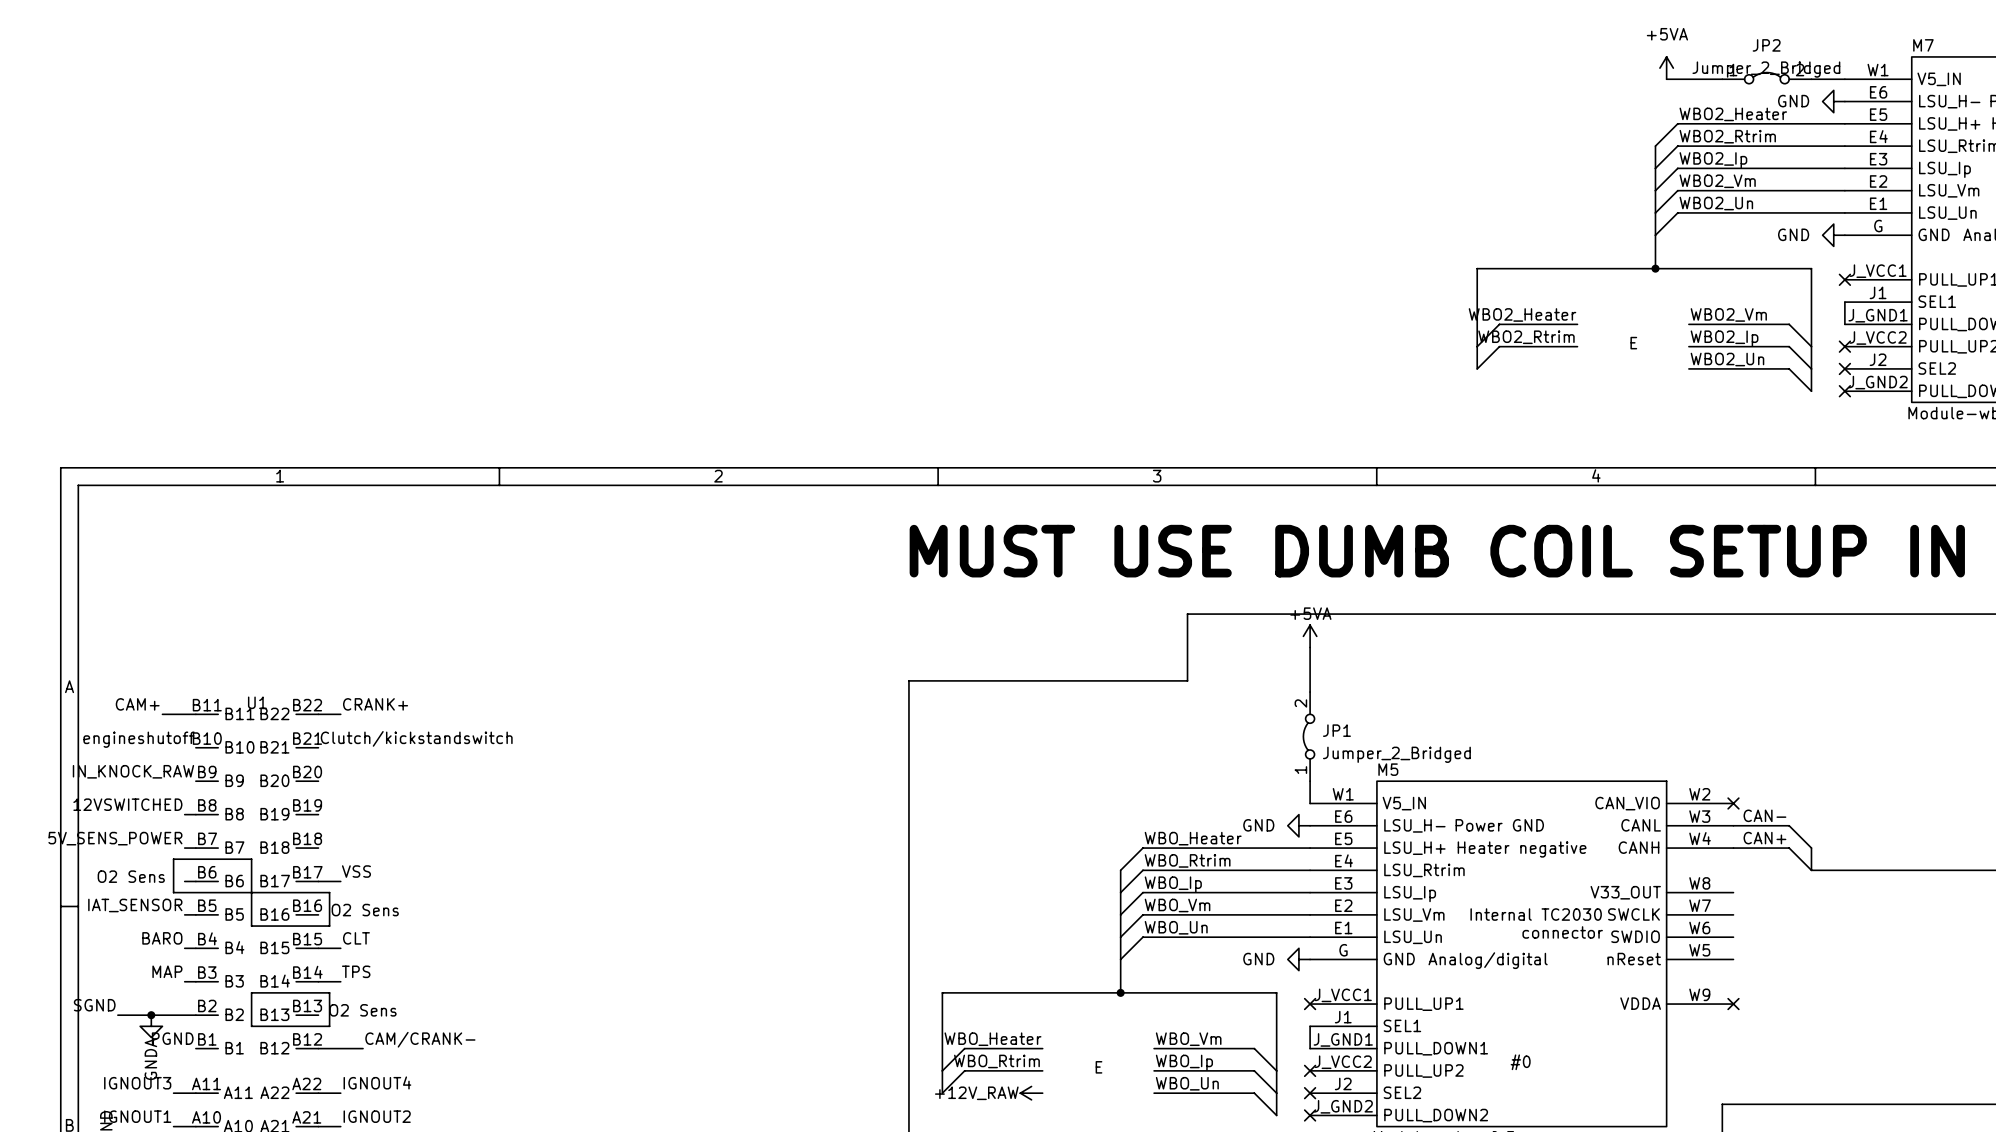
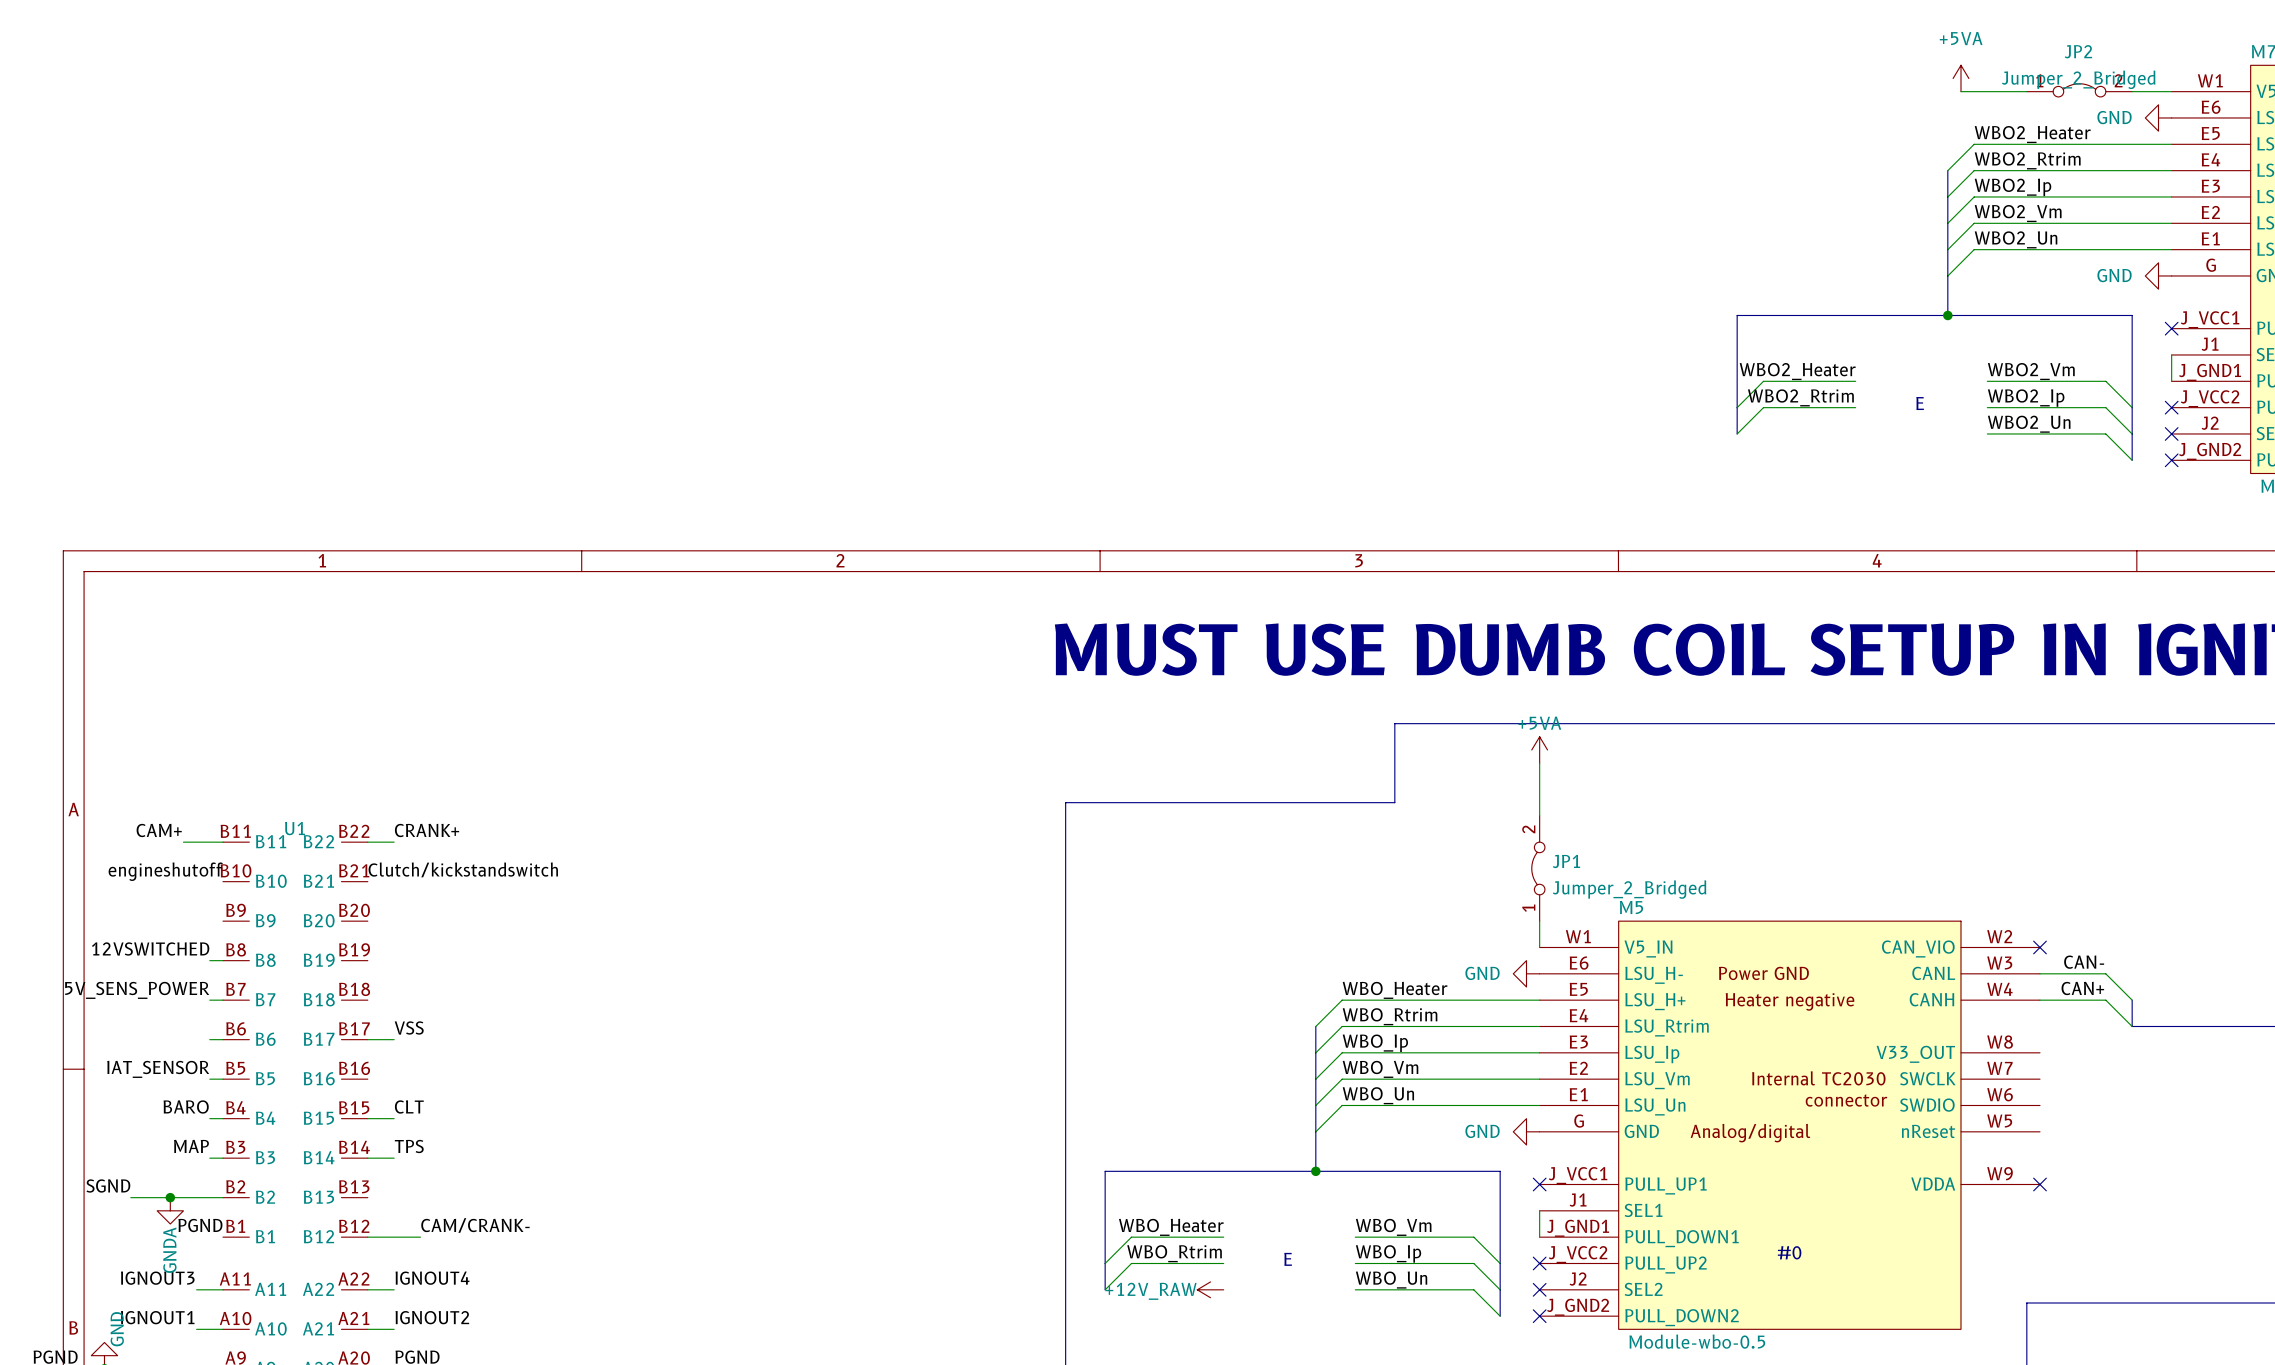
label: IN_KNOCK_RAW (133, 771) -> none
line: (173, 859) (251, 859) (251, 926) (329, 926) (329, 892) (173, 892) (173, 859) -> none
text: O2 Sens (131, 876) -> none
text: O2 Sens (365, 910) -> none
line: (251, 992) (251, 1026) (329, 1026) (329, 992) (251, 992) -> none
text: O2 Sens (363, 1010) -> none

